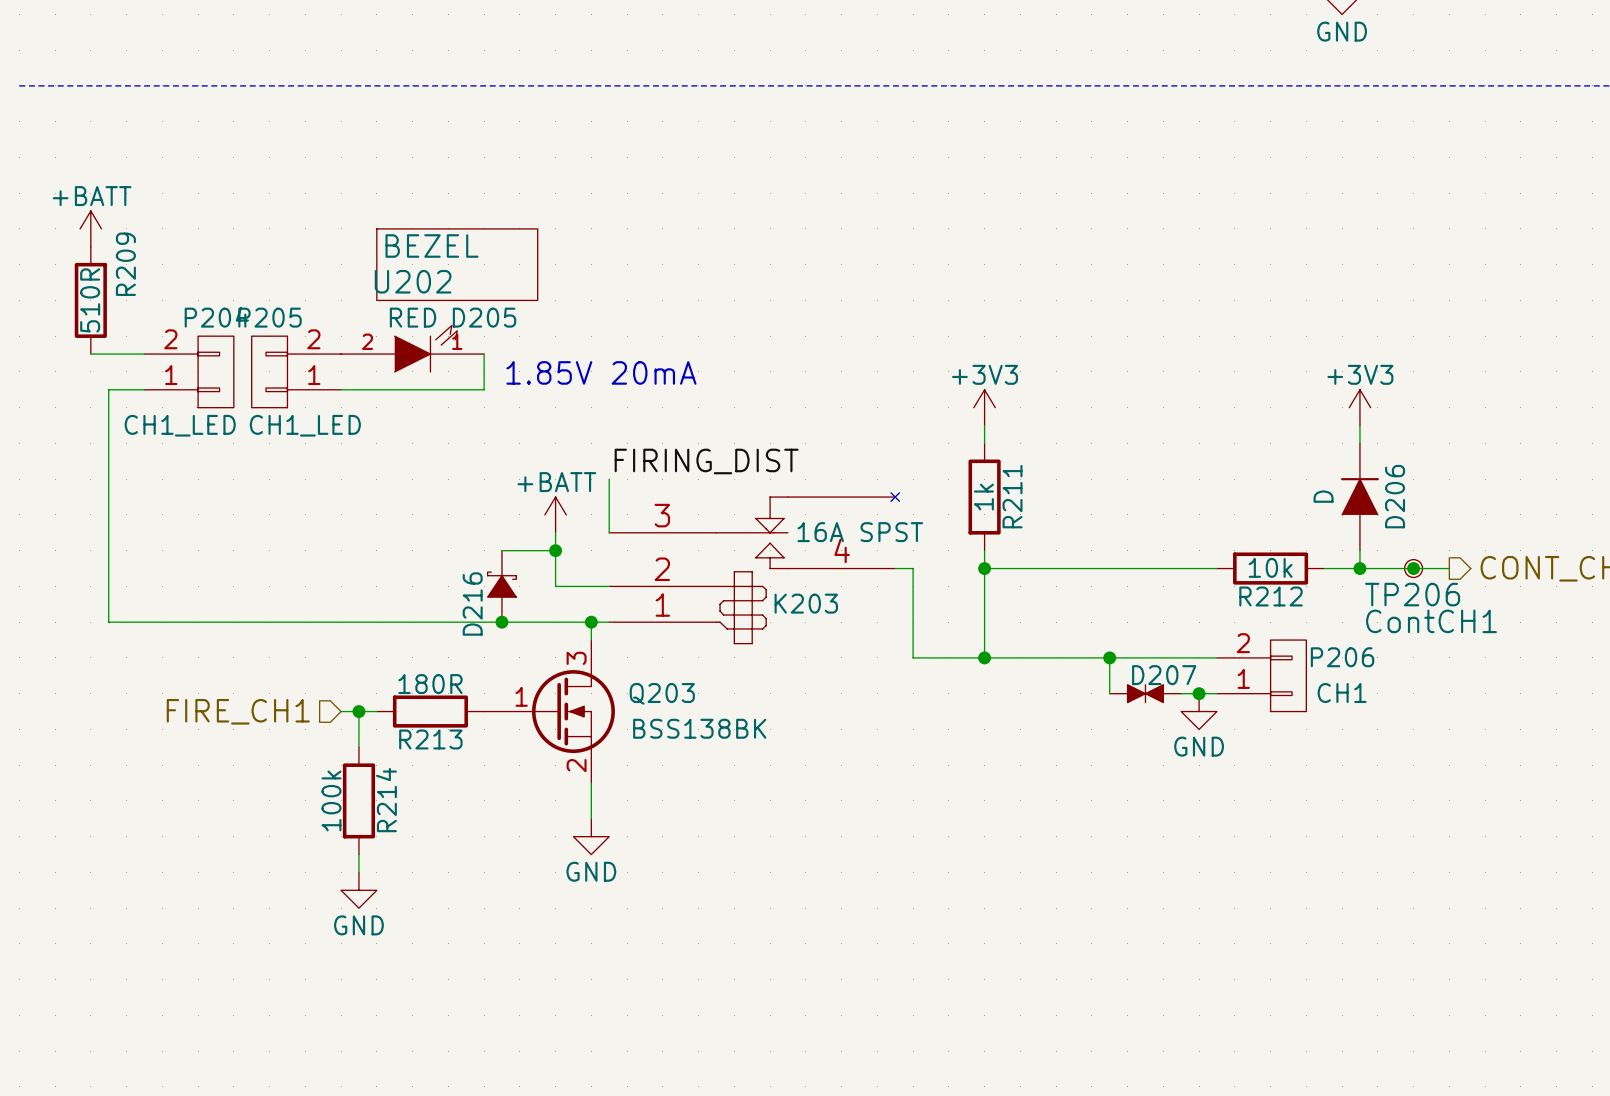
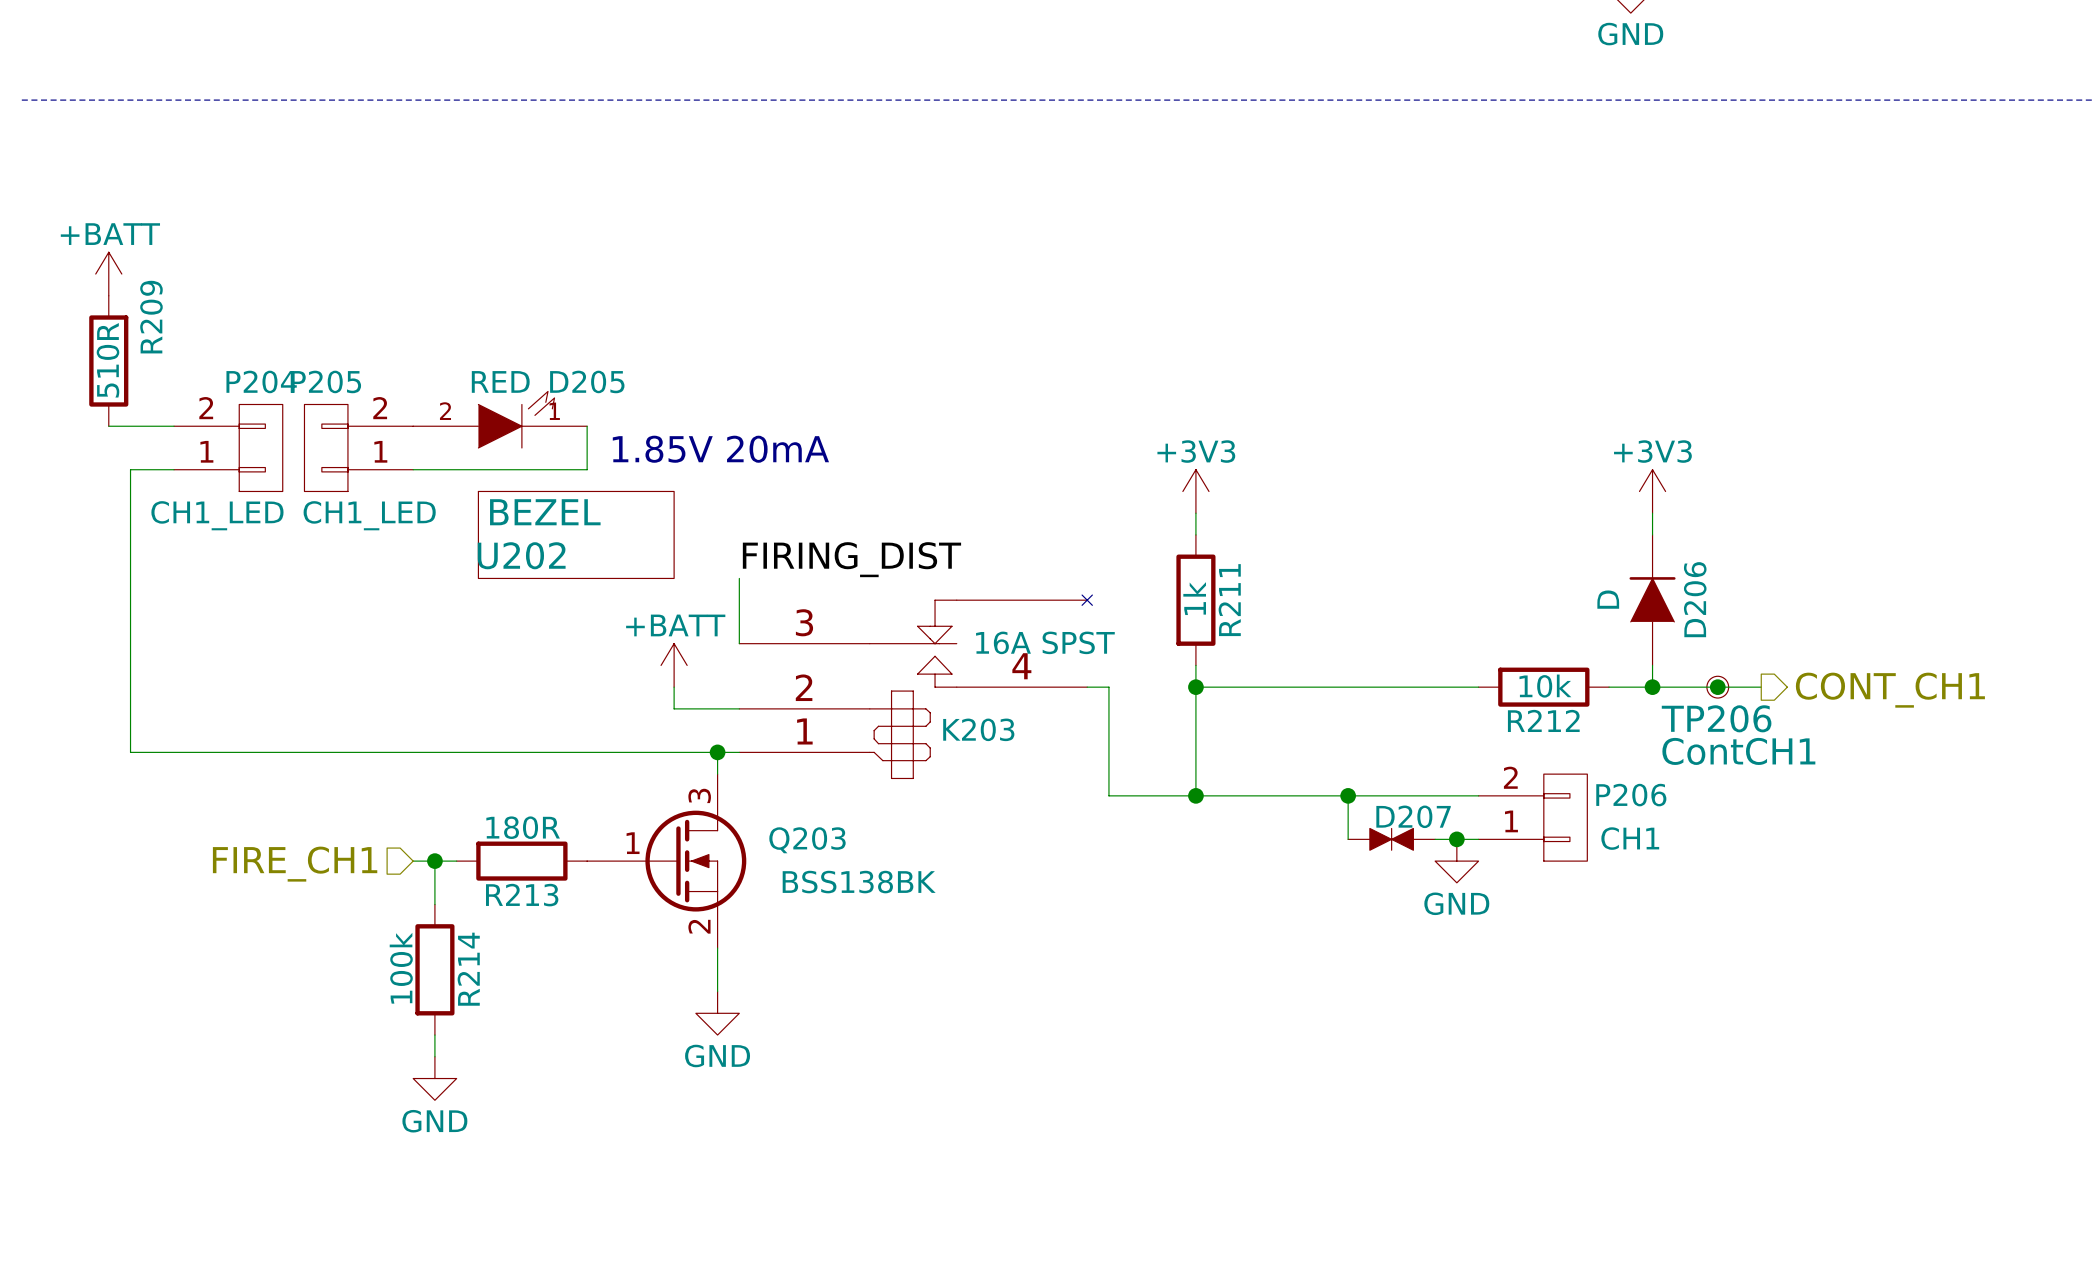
U202 position: (457, 264) -> (576, 534)
power symbol position: +BATT (555, 514) -> +BATT (674, 665)
wire: (501, 550) (555, 550) -> none
junction: (555, 550) -> none
D216: (501, 586) -> none
junction: (501, 622) -> none

